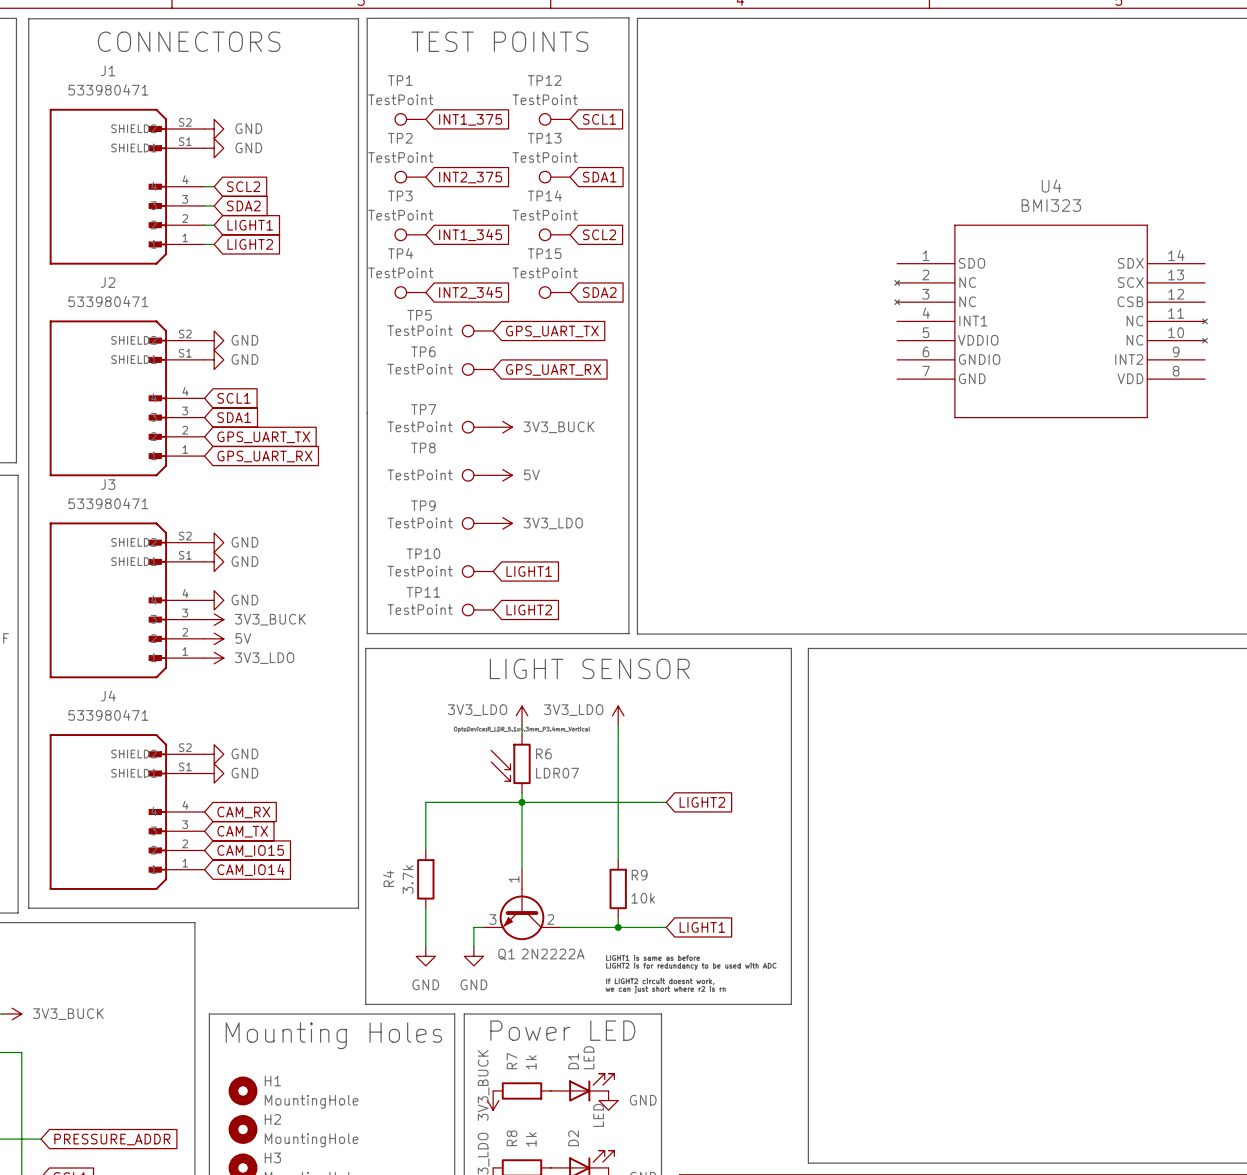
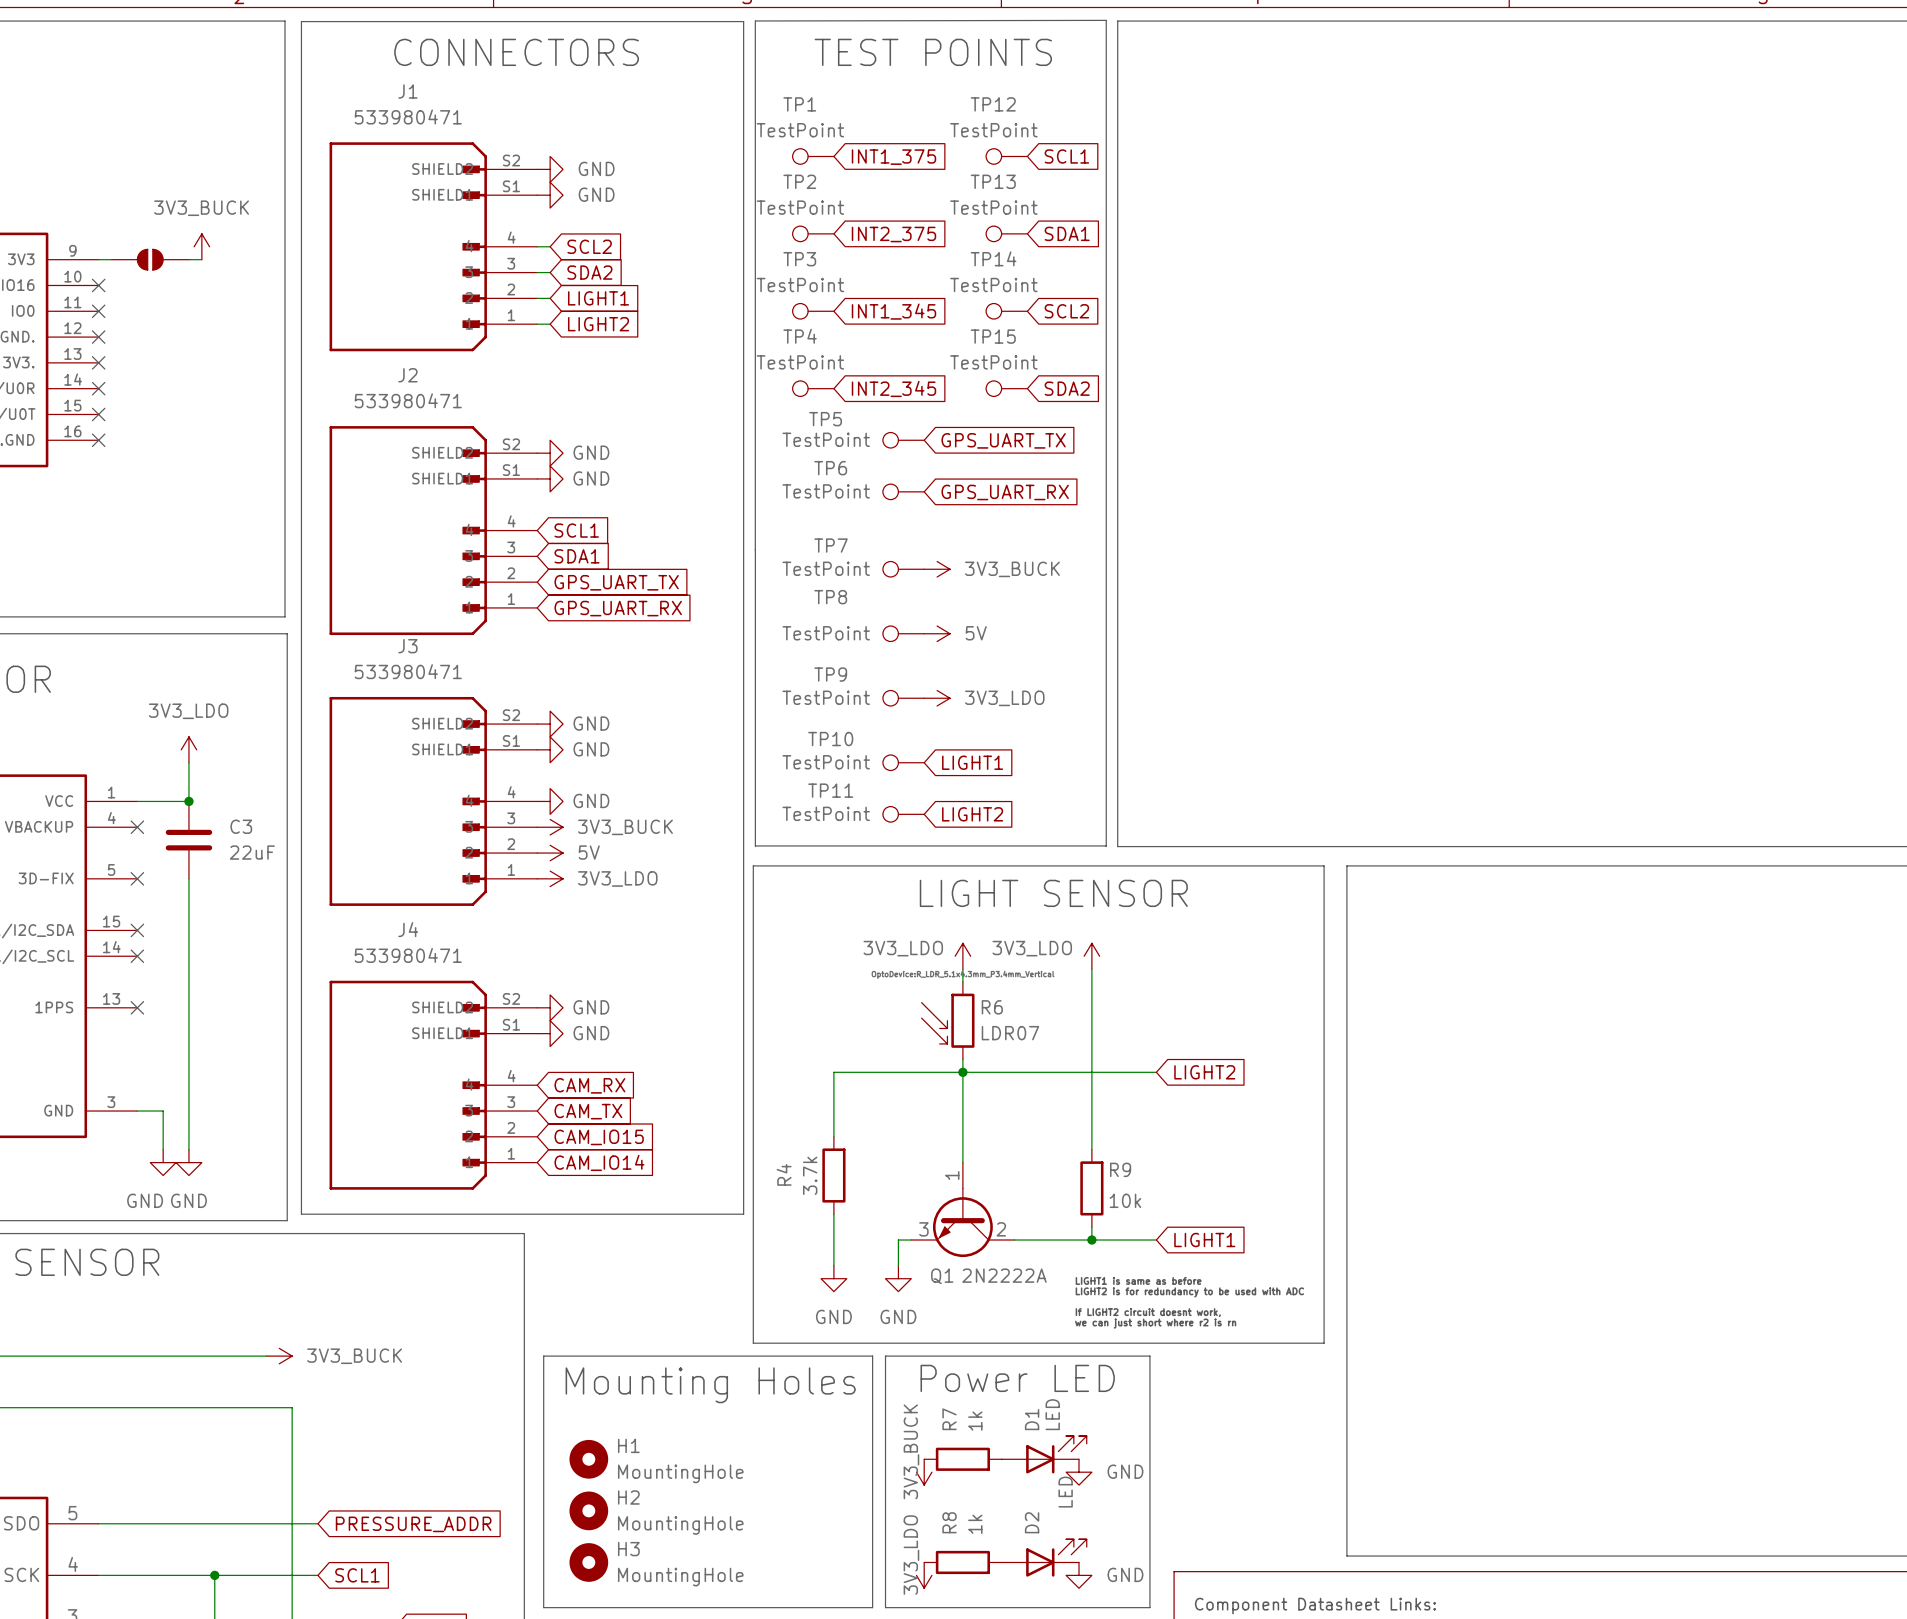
U4: BMI323 (1051, 321) -> none

